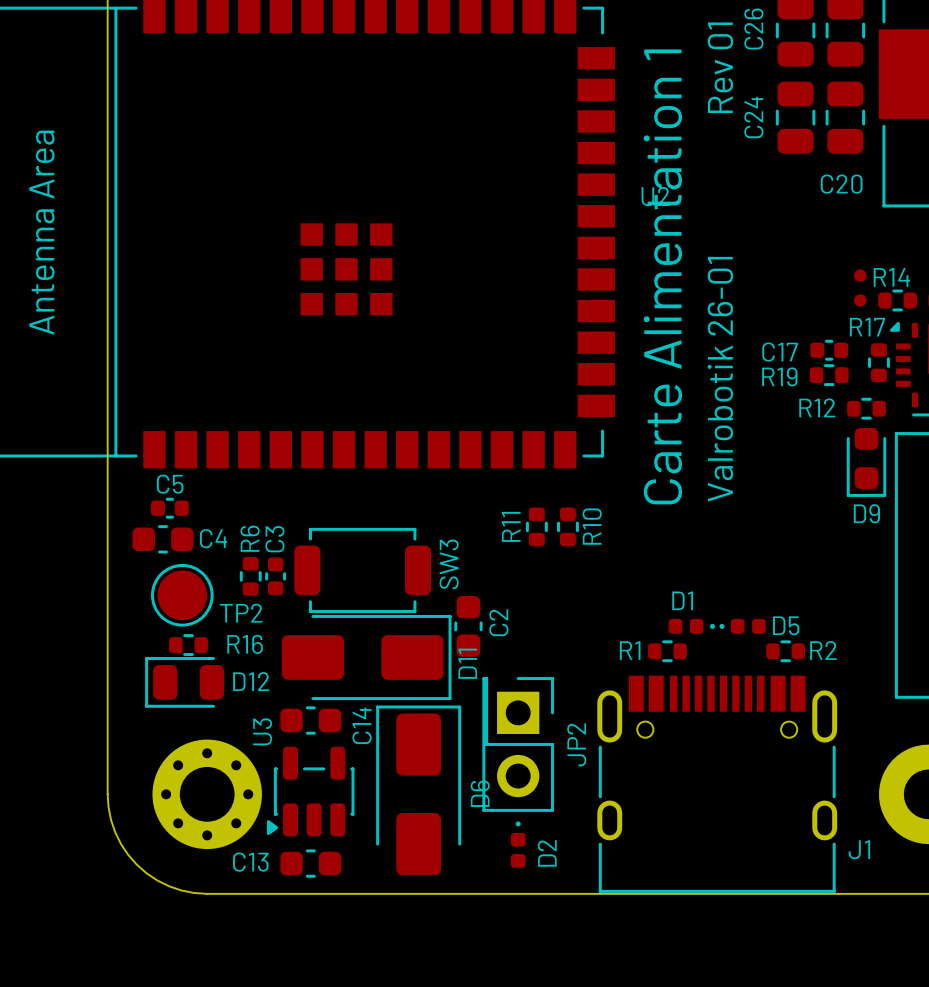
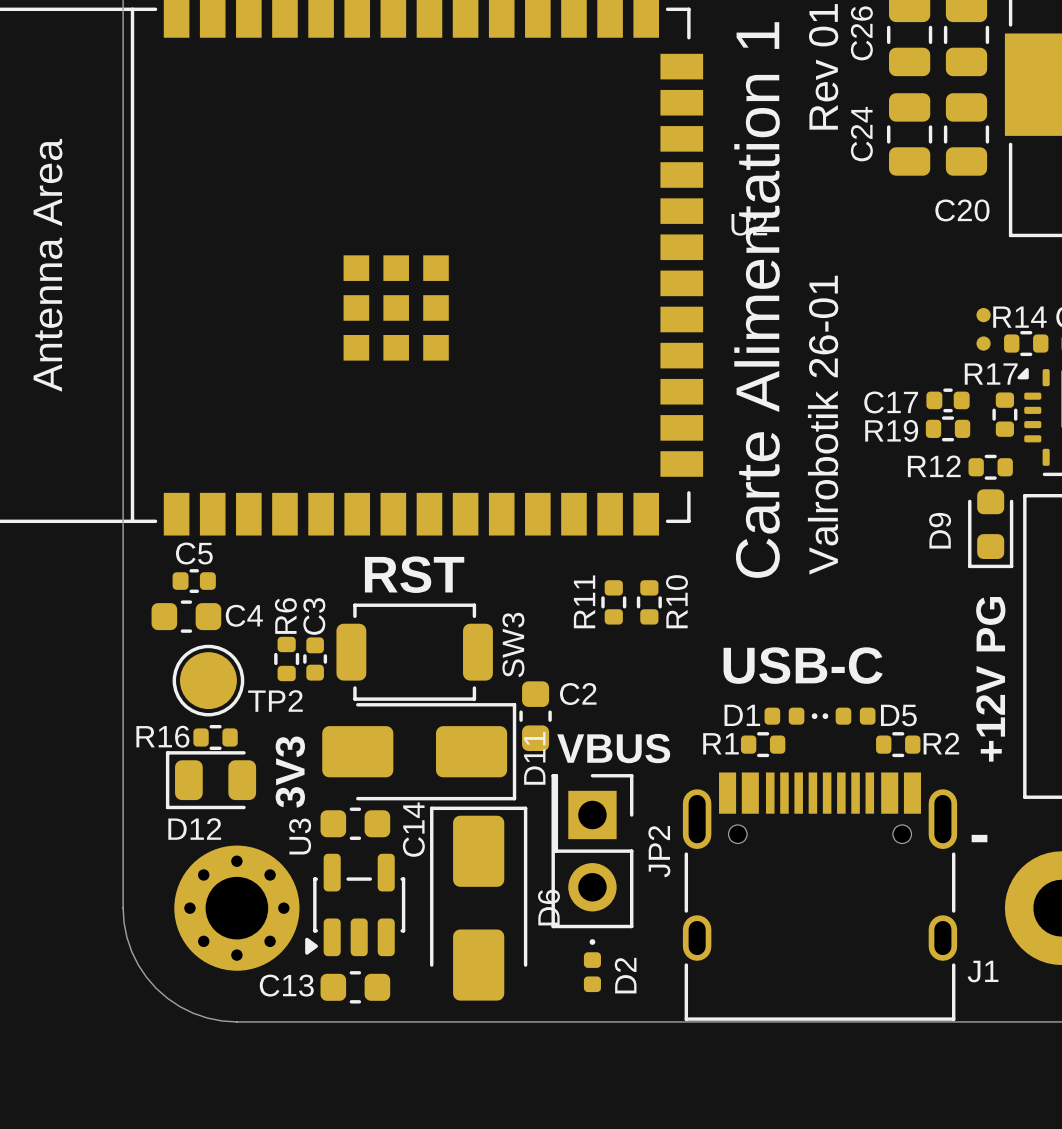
text: none -> RST (414, 574)
D9 name rotation: 0° (866, 513) -> 90° counterclockwise (940, 530)
D9 name position: D9 (866, 513) -> D9 (940, 530)
text: none -> USB-C (803, 665)
D1 name position: D1 (682, 600) -> D1 (742, 715)
text: none -> +12V PG (990, 679)
C2 name rotation: 0° (498, 622) -> 90° clockwise (578, 694)
R16 name position: R16 (245, 644) -> R16 (162, 736)
text: none -> VBUS (613, 748)
text: none -> 3V3 (290, 772)
D12 name position: D12 (251, 681) -> D12 (194, 828)
text: none -> - (979, 838)

